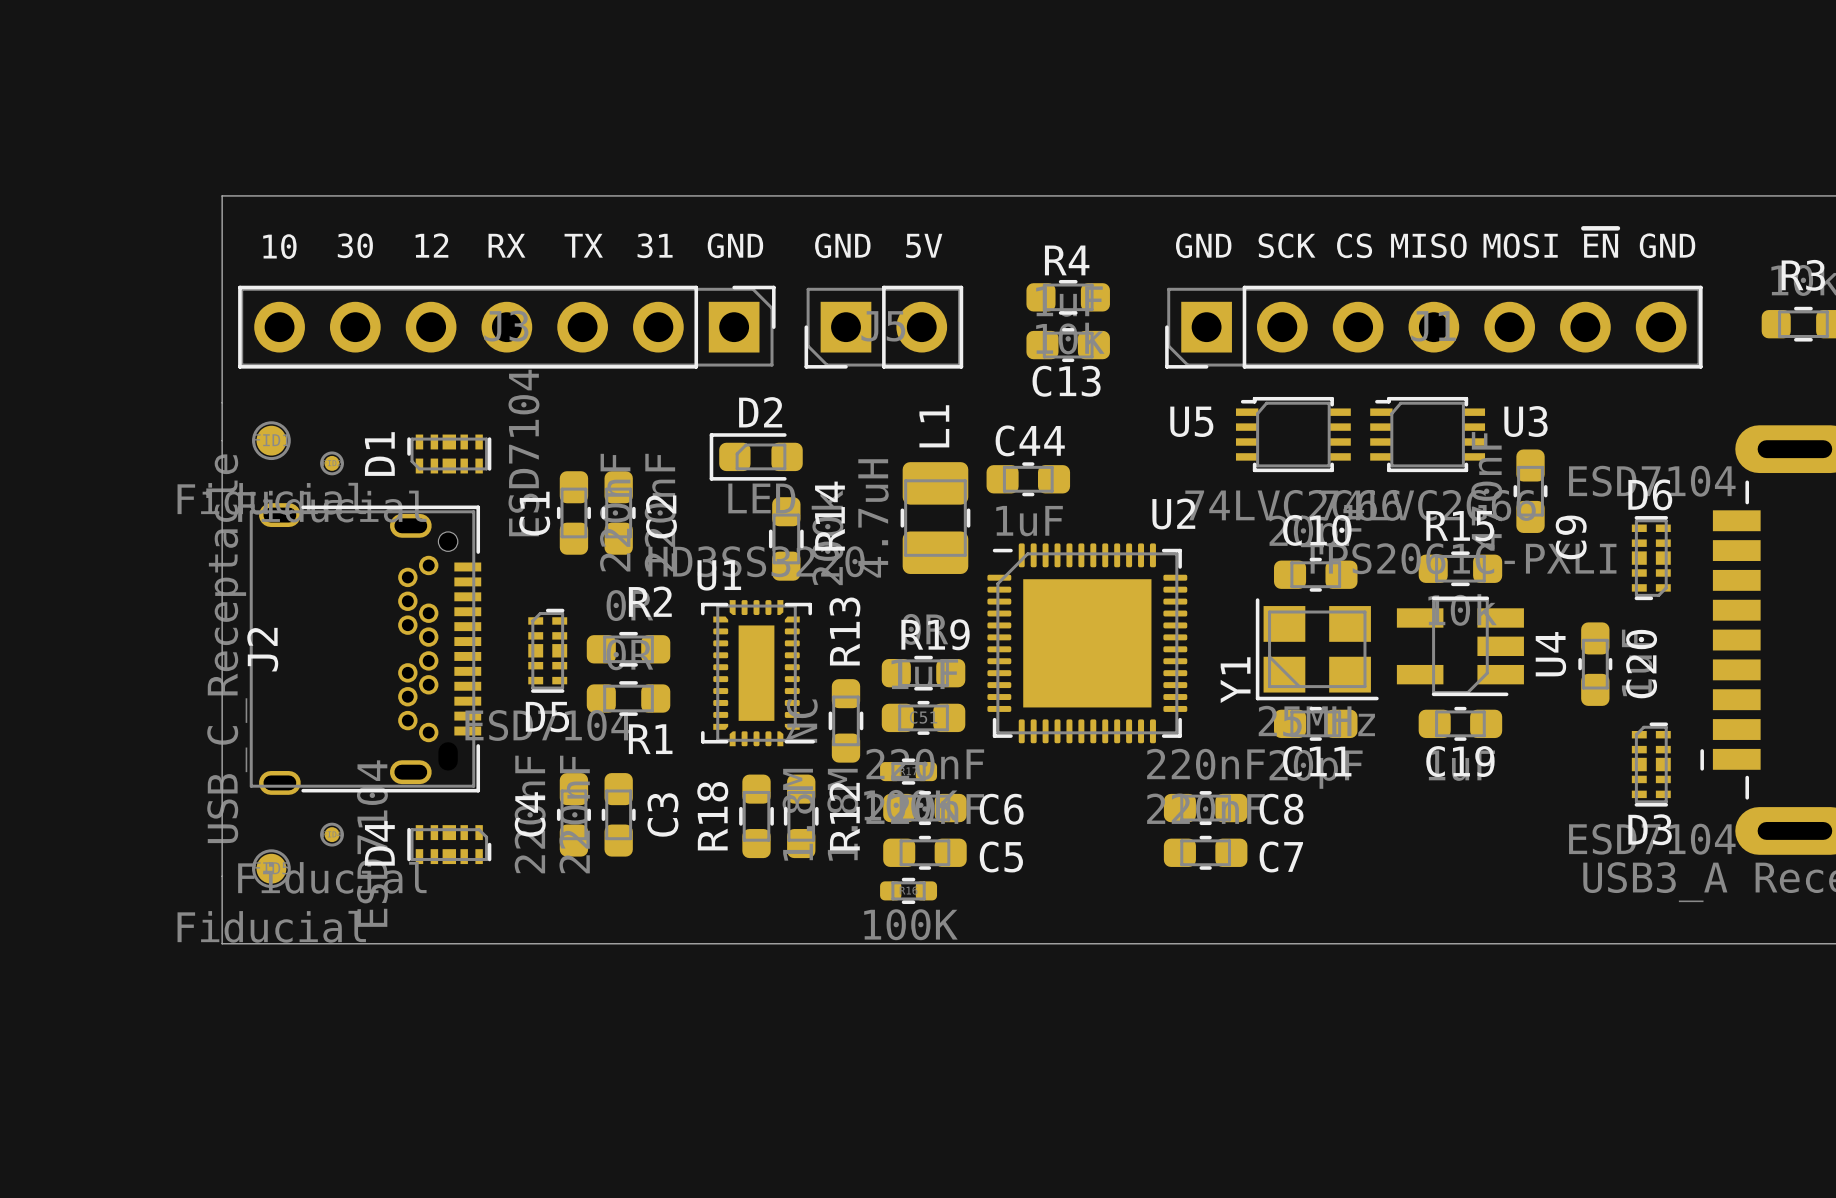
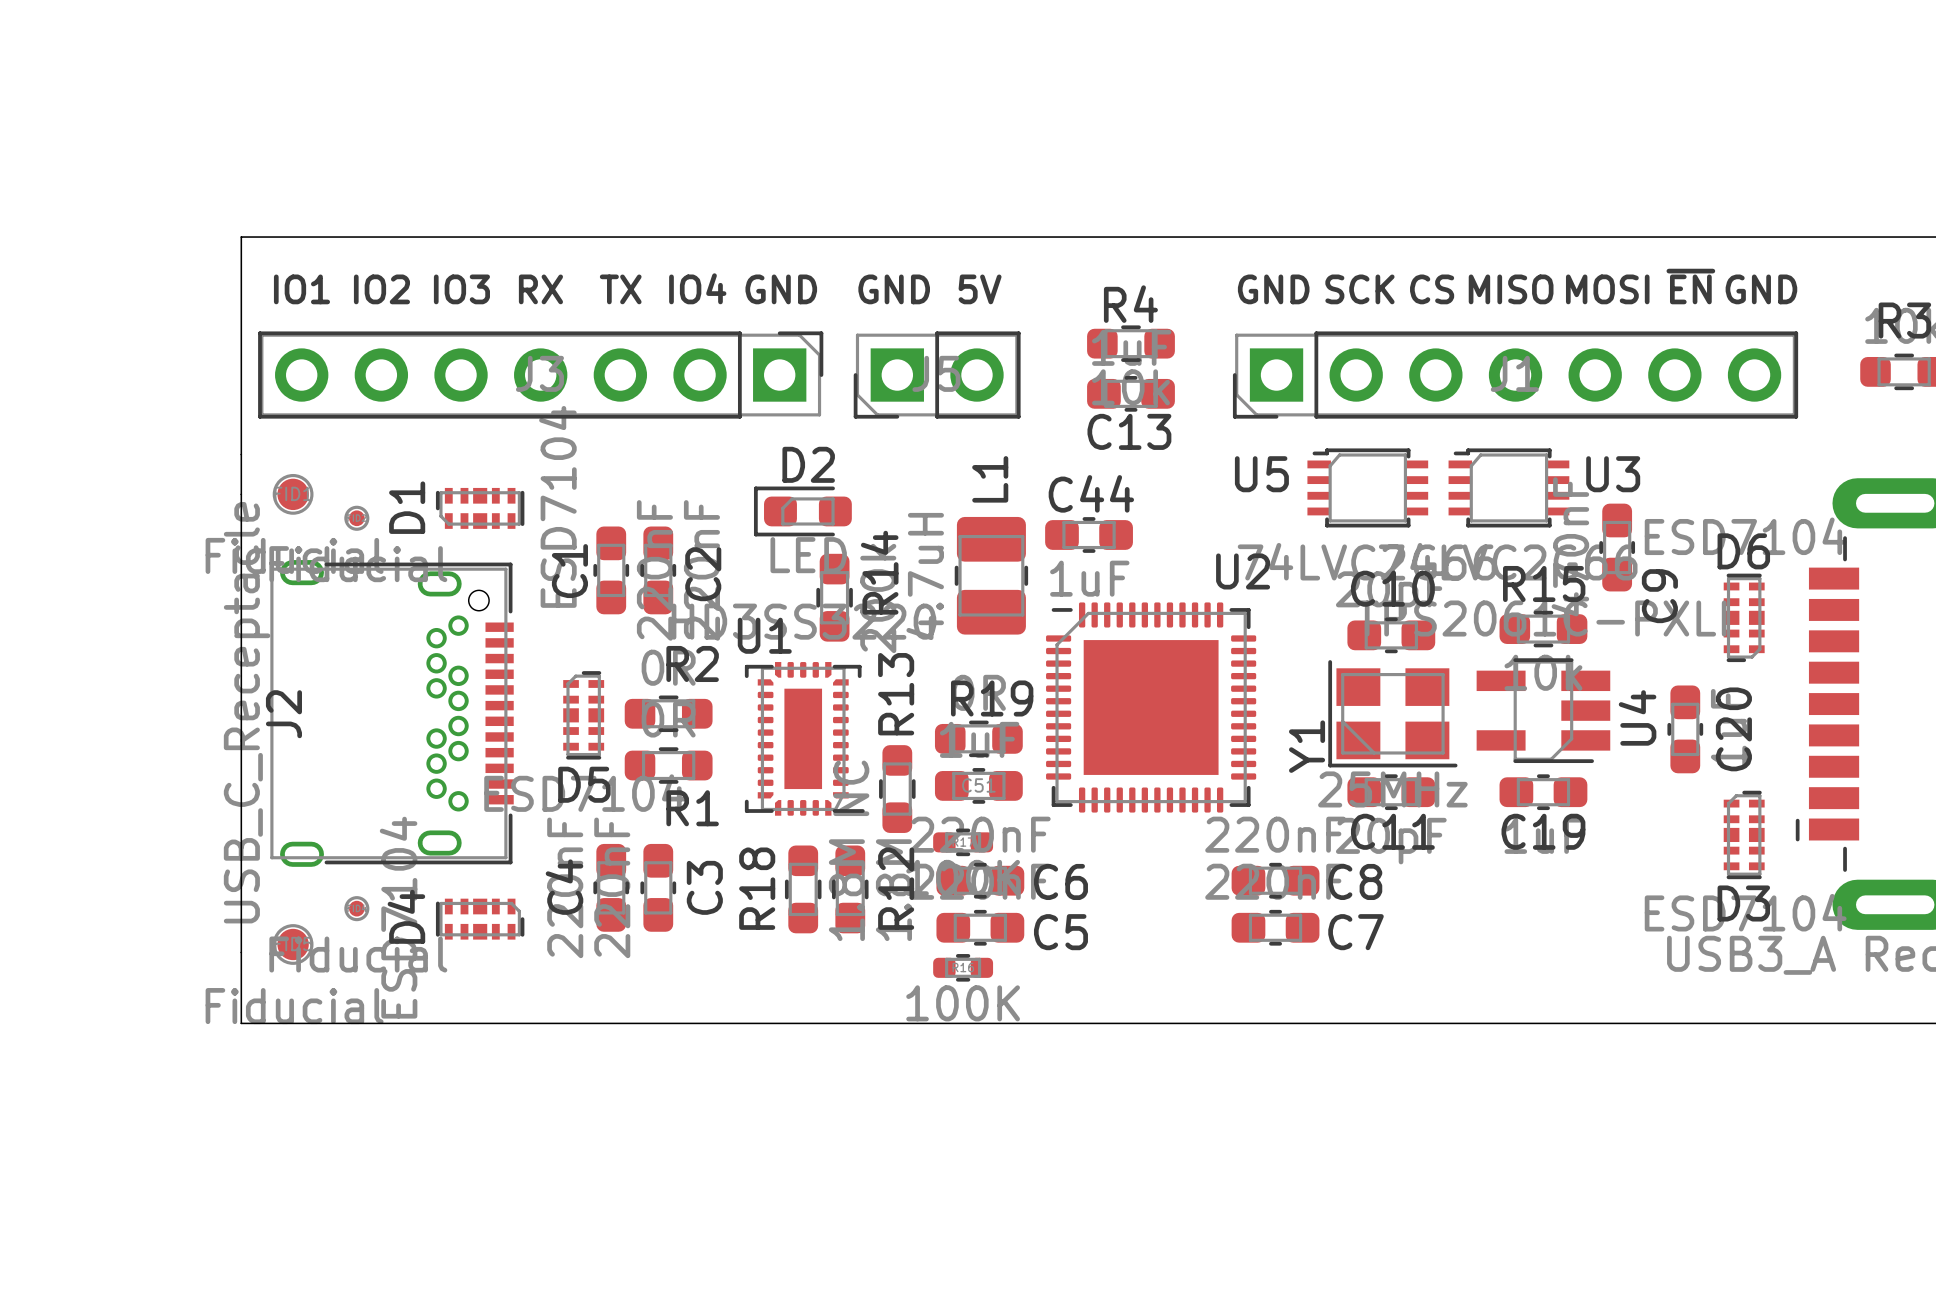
text: 30 (355, 245) -> IO2 (381, 289)
text: 12 (431, 245) -> IO3 (461, 289)
text: 31 (655, 245) -> IO4 (697, 288)
text: 10 (279, 246) -> IO1 (301, 289)

